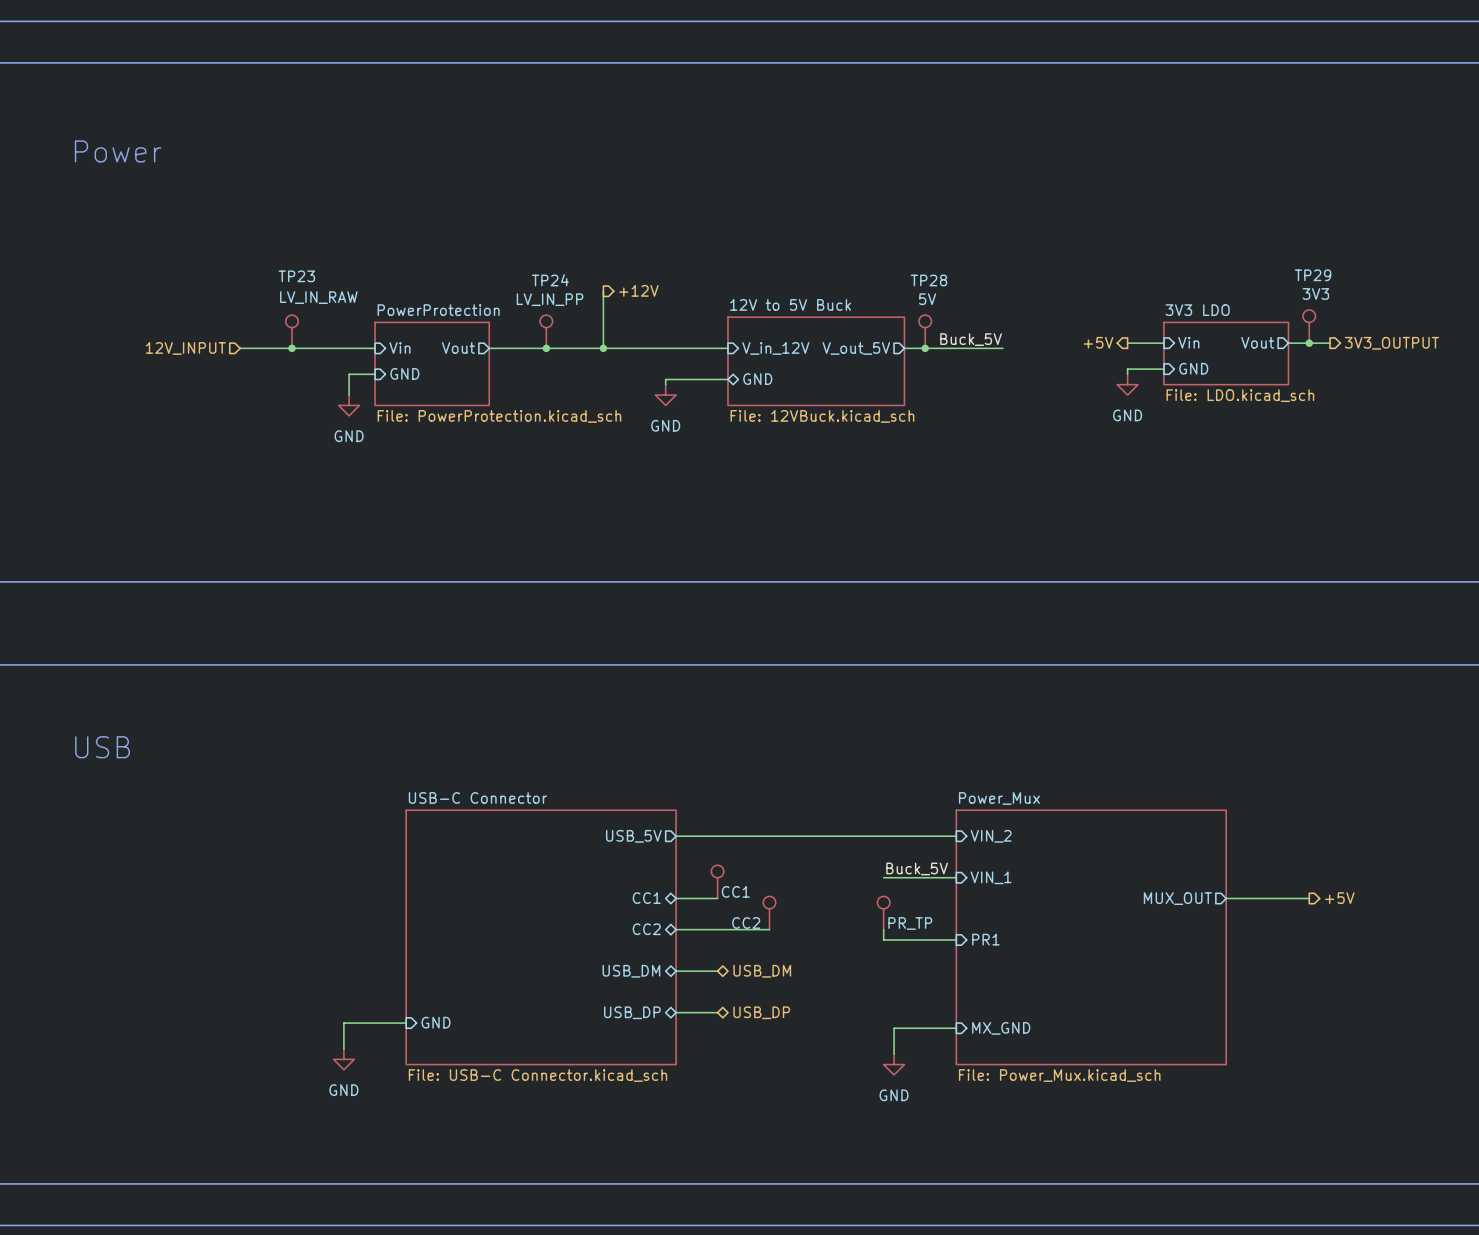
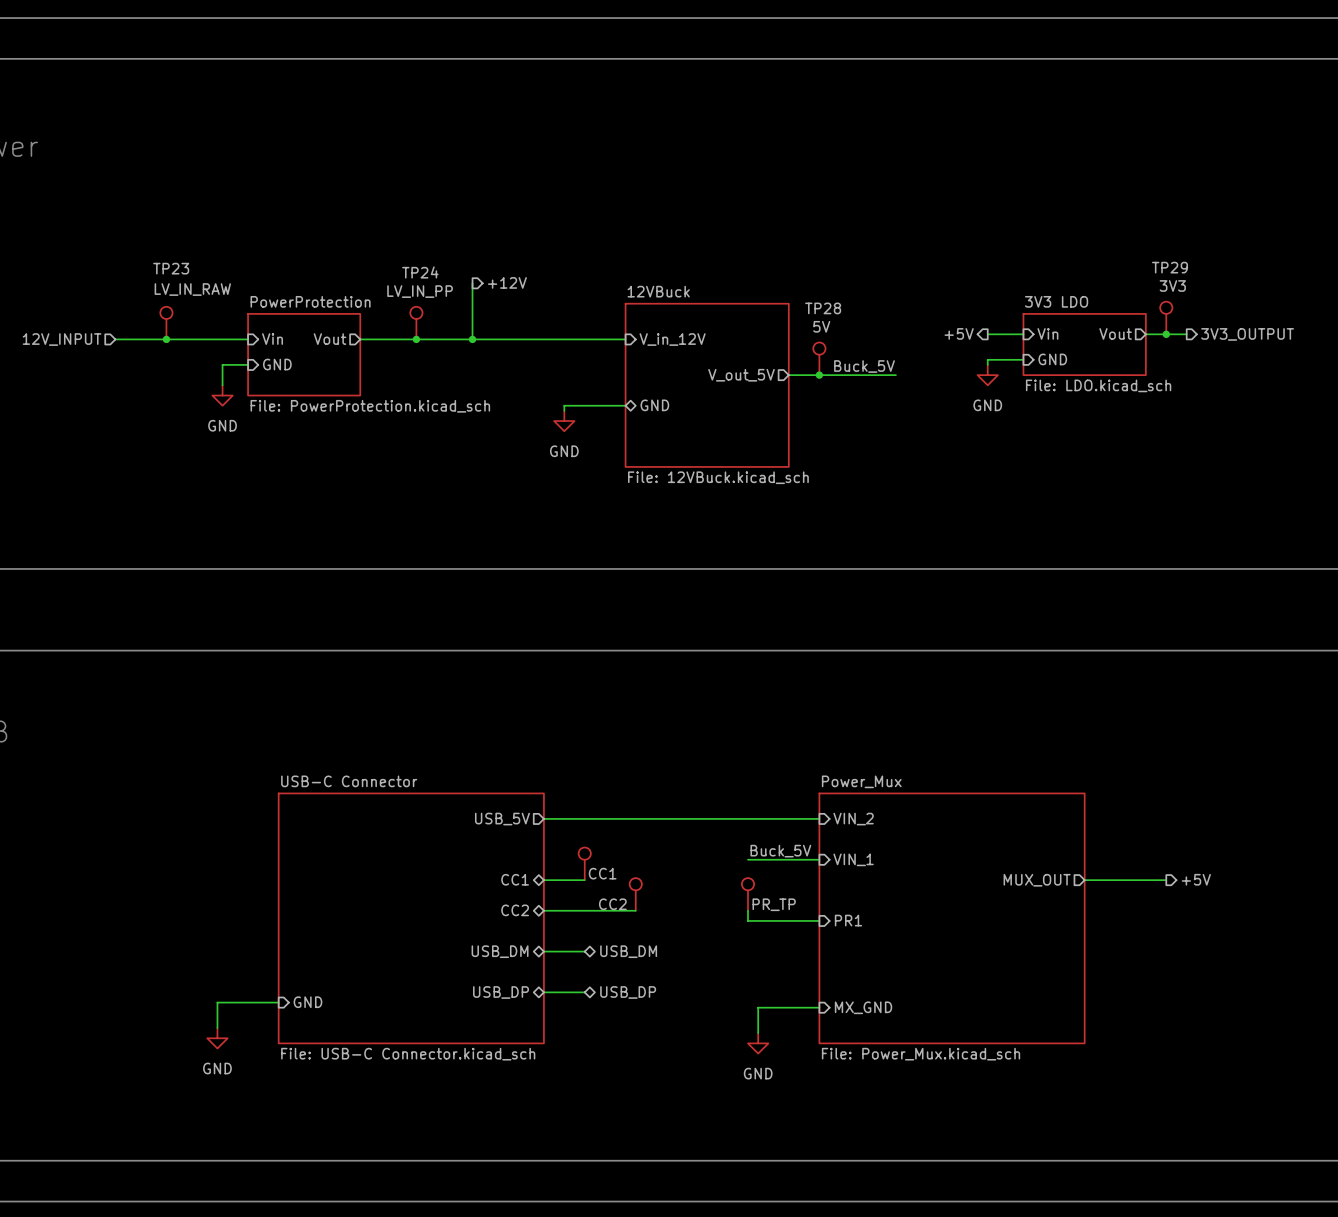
TP28 position: (925, 331) -> (819, 358)
label position: Buck_5V (971, 339) -> Buck_5V (864, 366)
wire: none -> (594, 339) (625, 339)
sheet pin position: V_in_12V (775, 348) -> V_in_12V (672, 339)
sheet pin position: V_out_5V (856, 348) -> V_out_5V (741, 375)
wire: (904, 348) (1003, 348) -> none
junction position: (925, 348) -> (819, 375)
sheet 12V to 5V Buck: File: 12VBuck.kicad_sch (816, 361) -> none
wire: (727, 379) (665, 379) (665, 384) -> (625, 405) (564, 405) (564, 410)
sheet pin position: GND (757, 379) -> GND (654, 405)
wire: none -> (788, 375) (895, 375)
power symbol position: GND (665, 395) -> GND (564, 421)
sheet 12VBuck: none -> File: 12VBuck.kicad_sch (707, 385)

